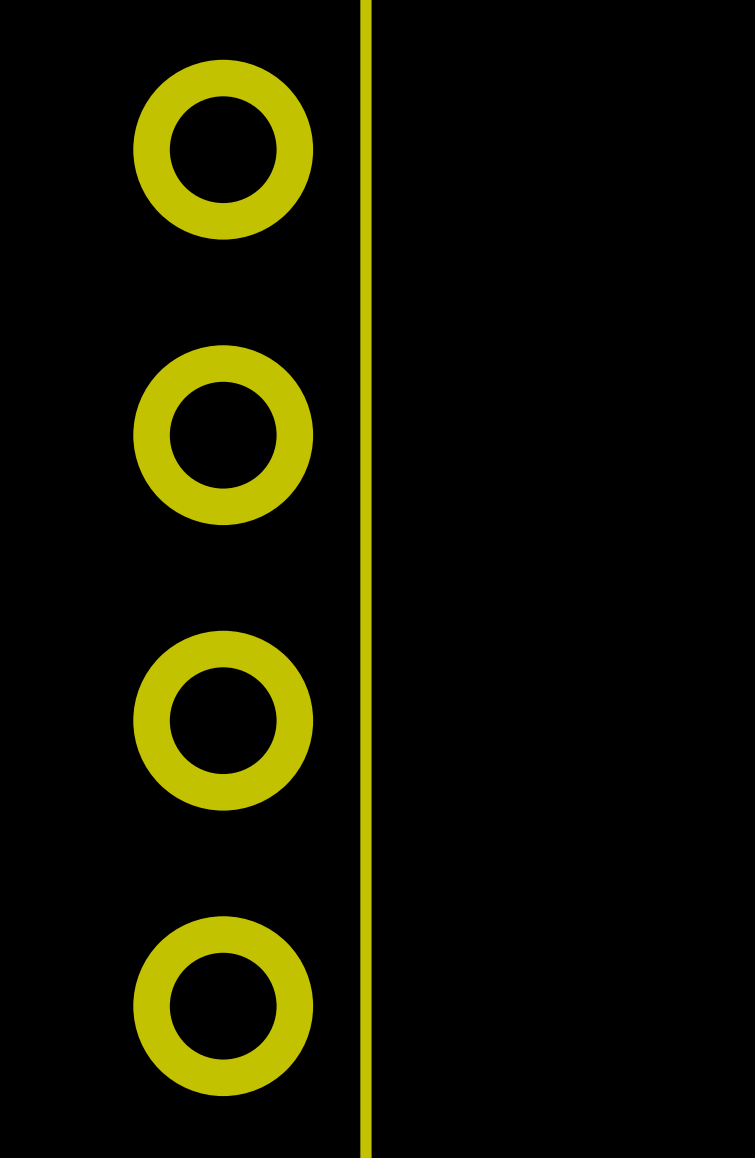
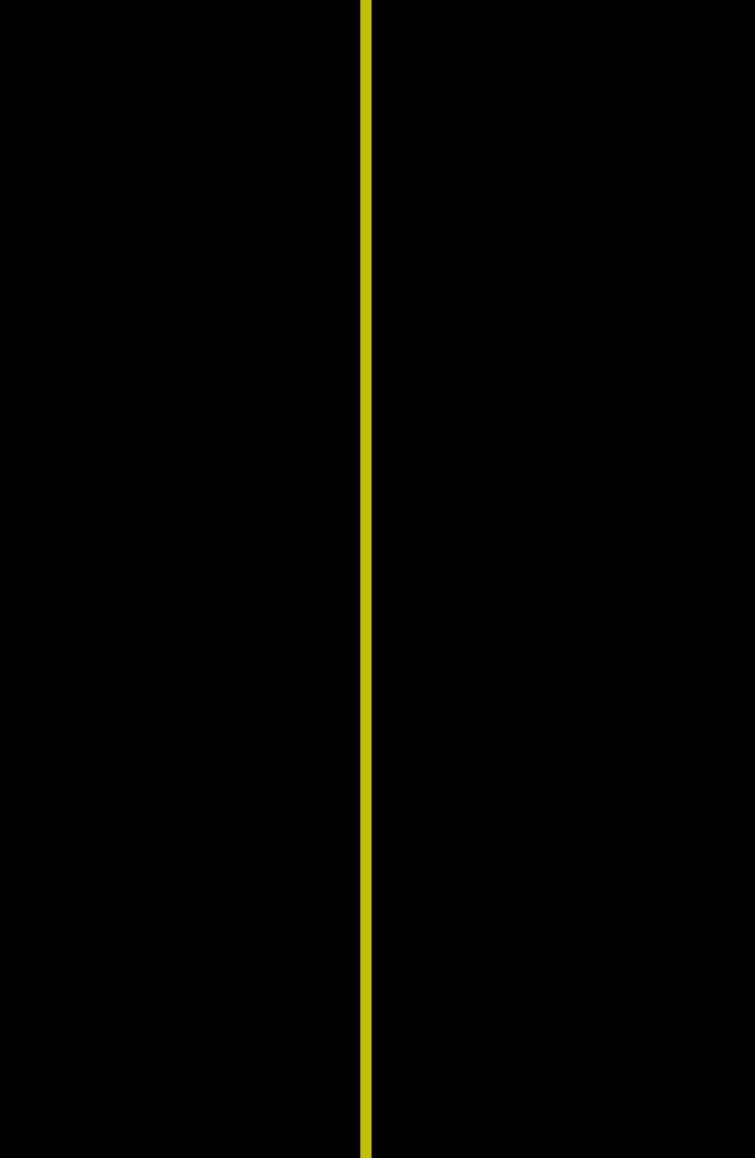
part: (223, 149) -> none
part: (223, 435) -> none
part: (223, 720) -> none
part: (223, 1006) -> none

